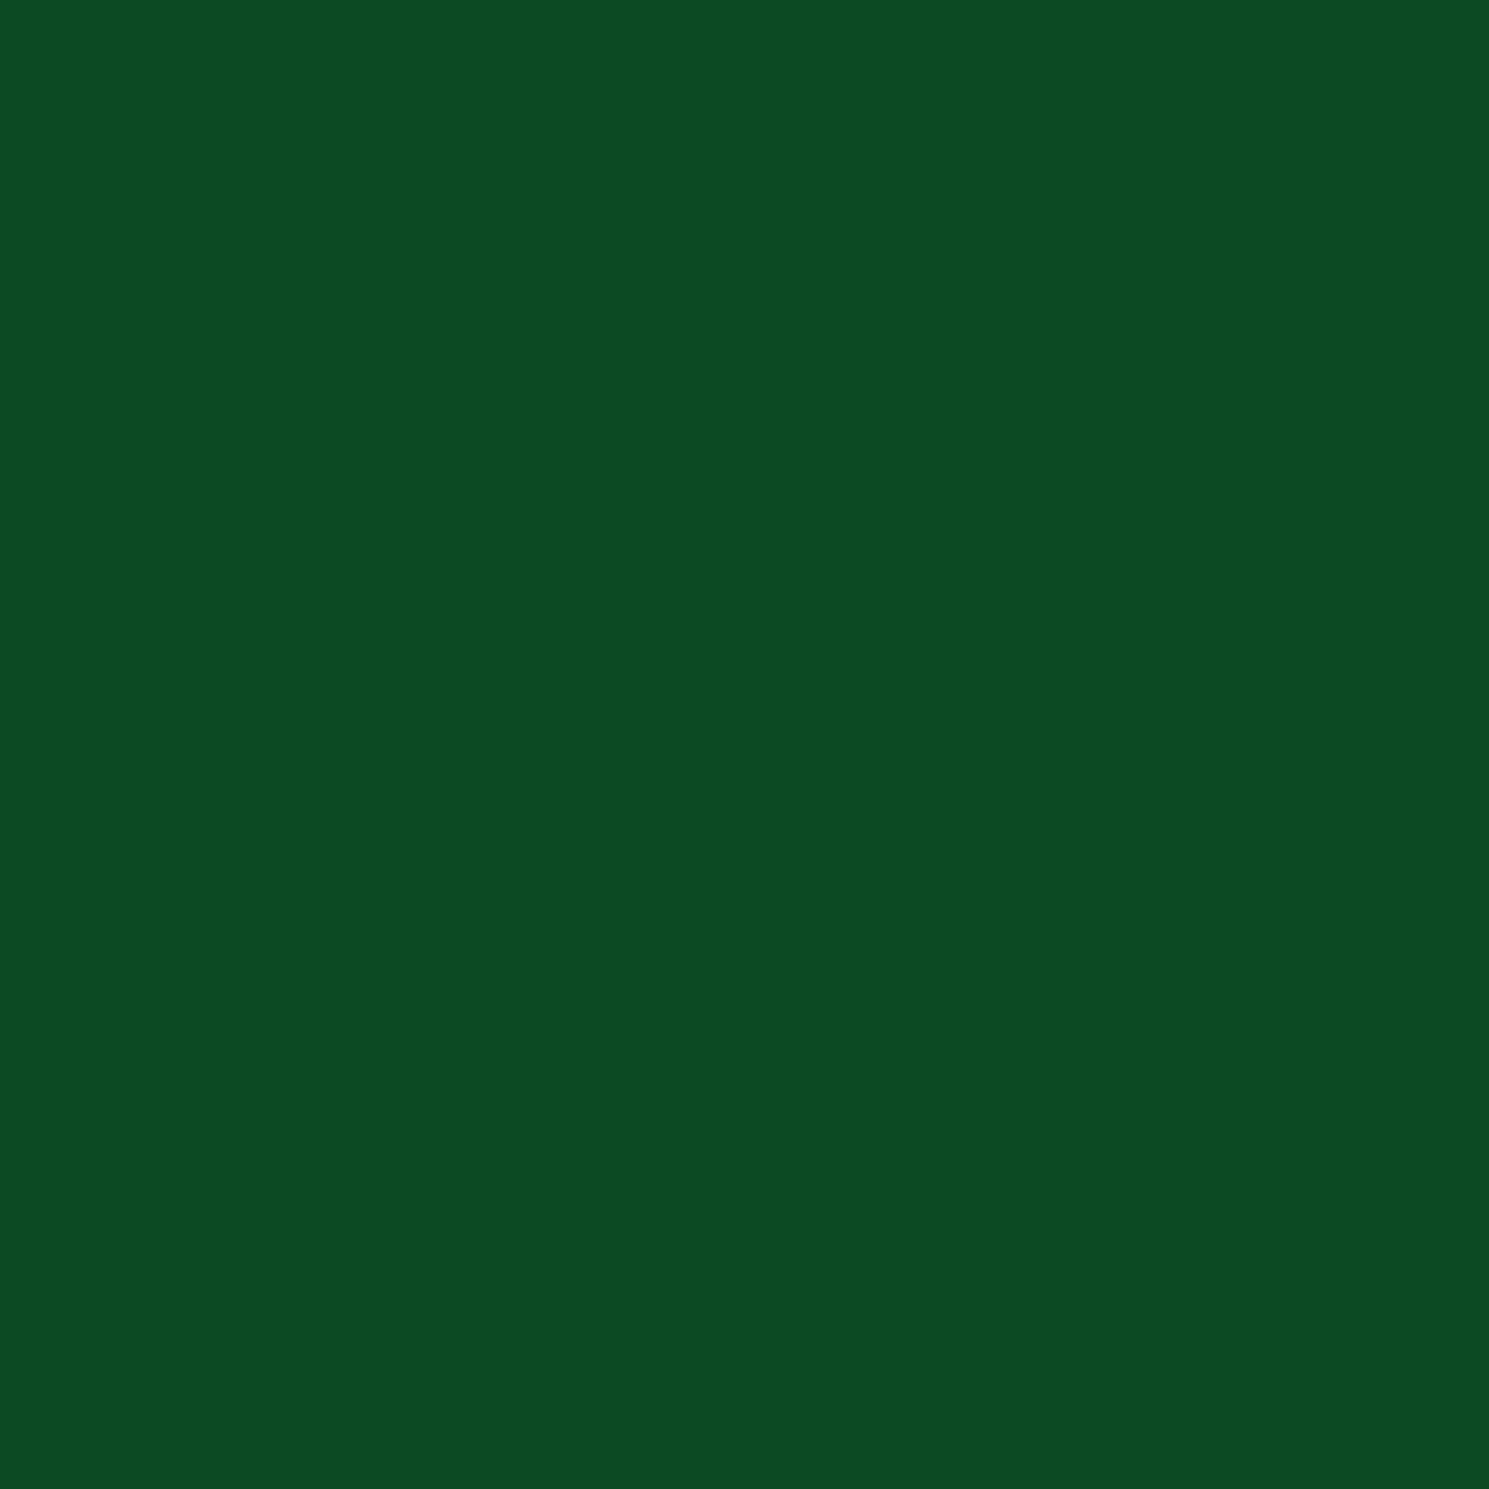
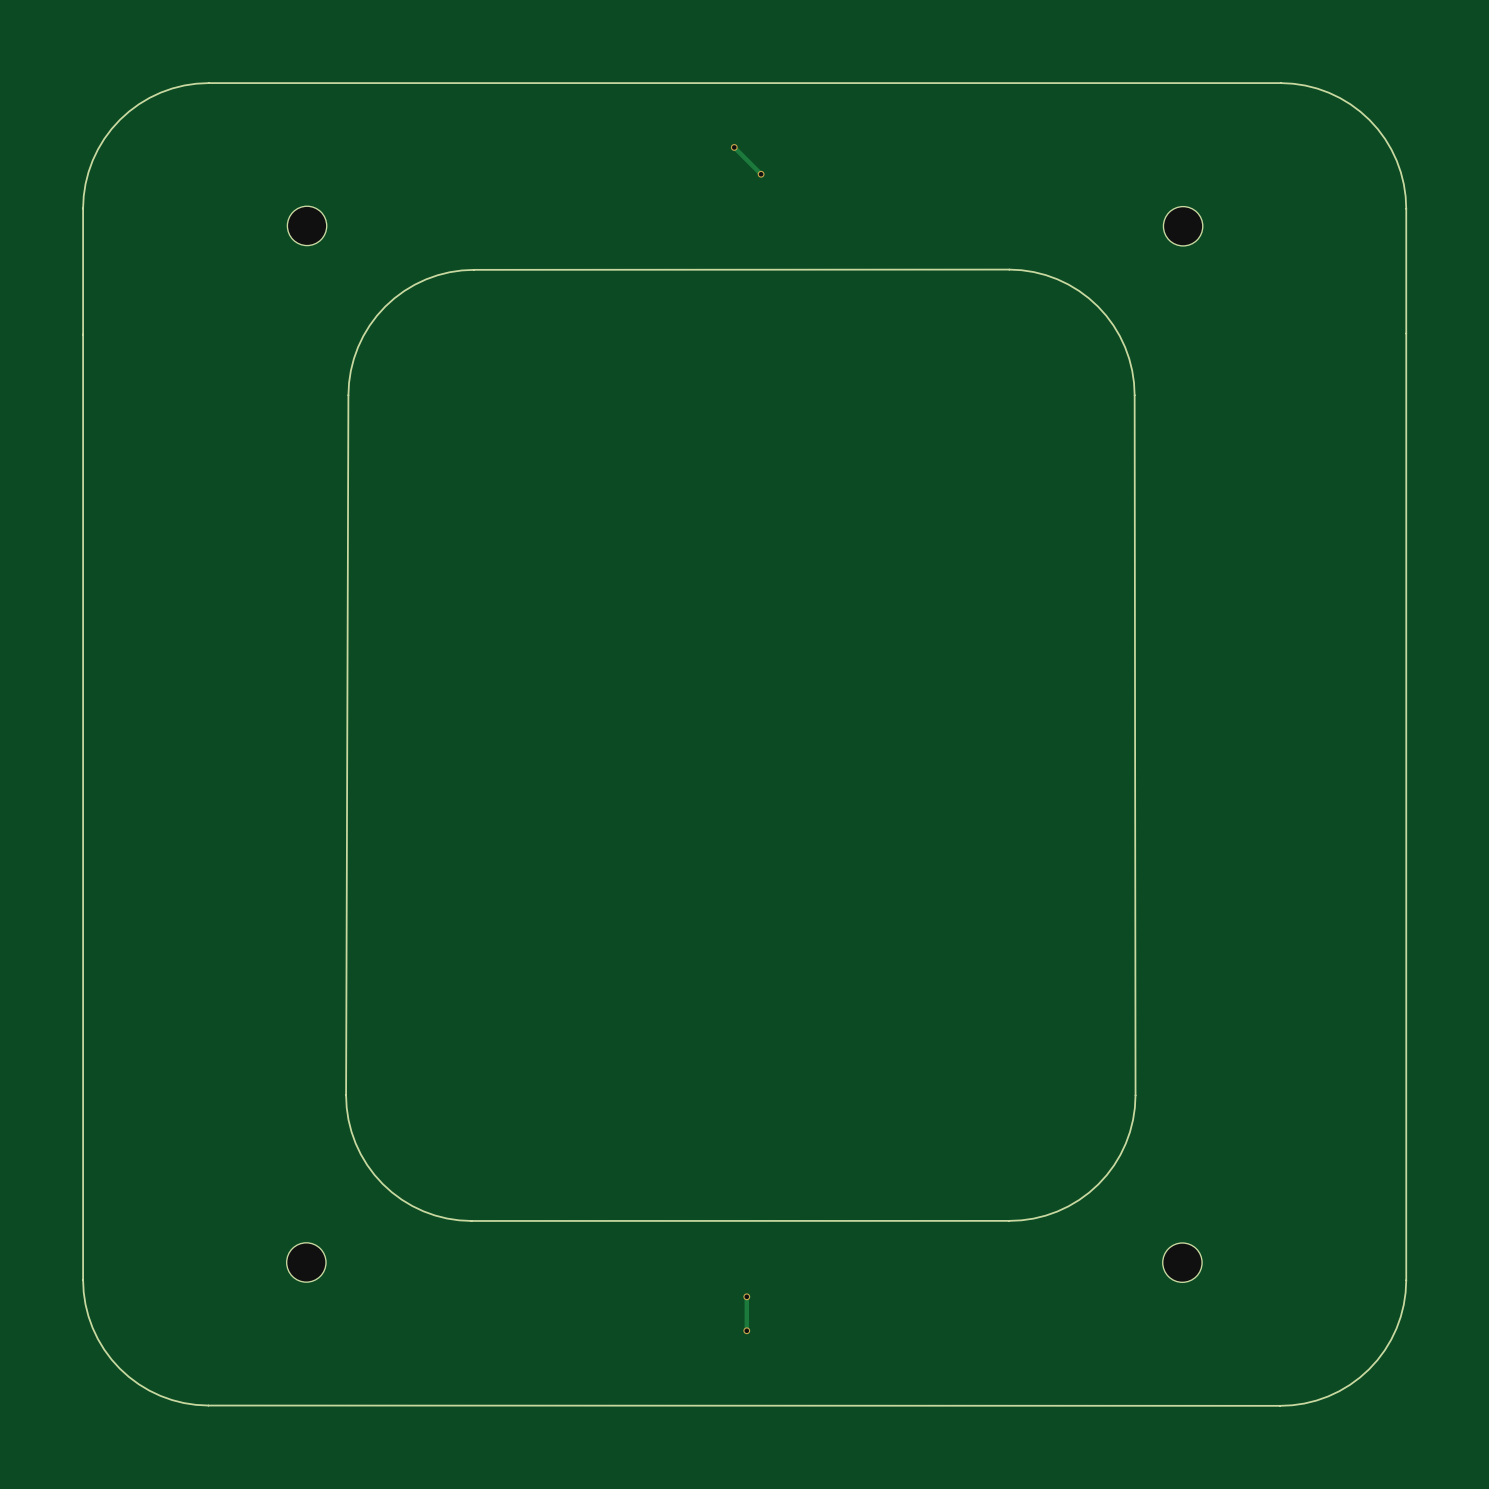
board edge: none -> (1280, 83) (208, 83) (184, 85) (149, 97) (129, 111) (111, 128) (98, 149) (88, 172) (83, 208) (83, 1279) (85, 1304) (92, 1327) (104, 1349) (128, 1376) (160, 1395) (183, 1403) (208, 1405) (1279, 1405) (1304, 1403) (1328, 1396) (1359, 1377) (1377, 1360) (1396, 1328) (1403, 1304) (1406, 1280) (1405, 196) (1400, 172) (1391, 149) (1377, 129) (1360, 111) (1340, 98) (1317, 88) (1280, 83)
track: none -> (734, 147) (761, 174)
via: none -> (734, 147)
via: none -> (761, 174)
part: none -> (307, 225)
part: none -> (1183, 226)
board edge: none -> (1009, 269) (461, 270) (437, 275) (414, 284) (394, 298) (369, 325) (353, 358) (348, 395) (346, 1095) (348, 1119) (360, 1154) (382, 1184) (401, 1199) (435, 1215) (471, 1220) (1021, 1220) (1057, 1211) (1079, 1199) (1098, 1184) (1114, 1165) (1130, 1131) (1135, 1095) (1134, 382) (1129, 358) (1119, 336) (1097, 306) (1078, 290) (1057, 279) (1033, 272) (1009, 269)
part: none -> (306, 1262)
part: none -> (1182, 1262)
track: none -> (746, 1296) (746, 1330)
via: none -> (746, 1296)
via: none -> (746, 1330)

